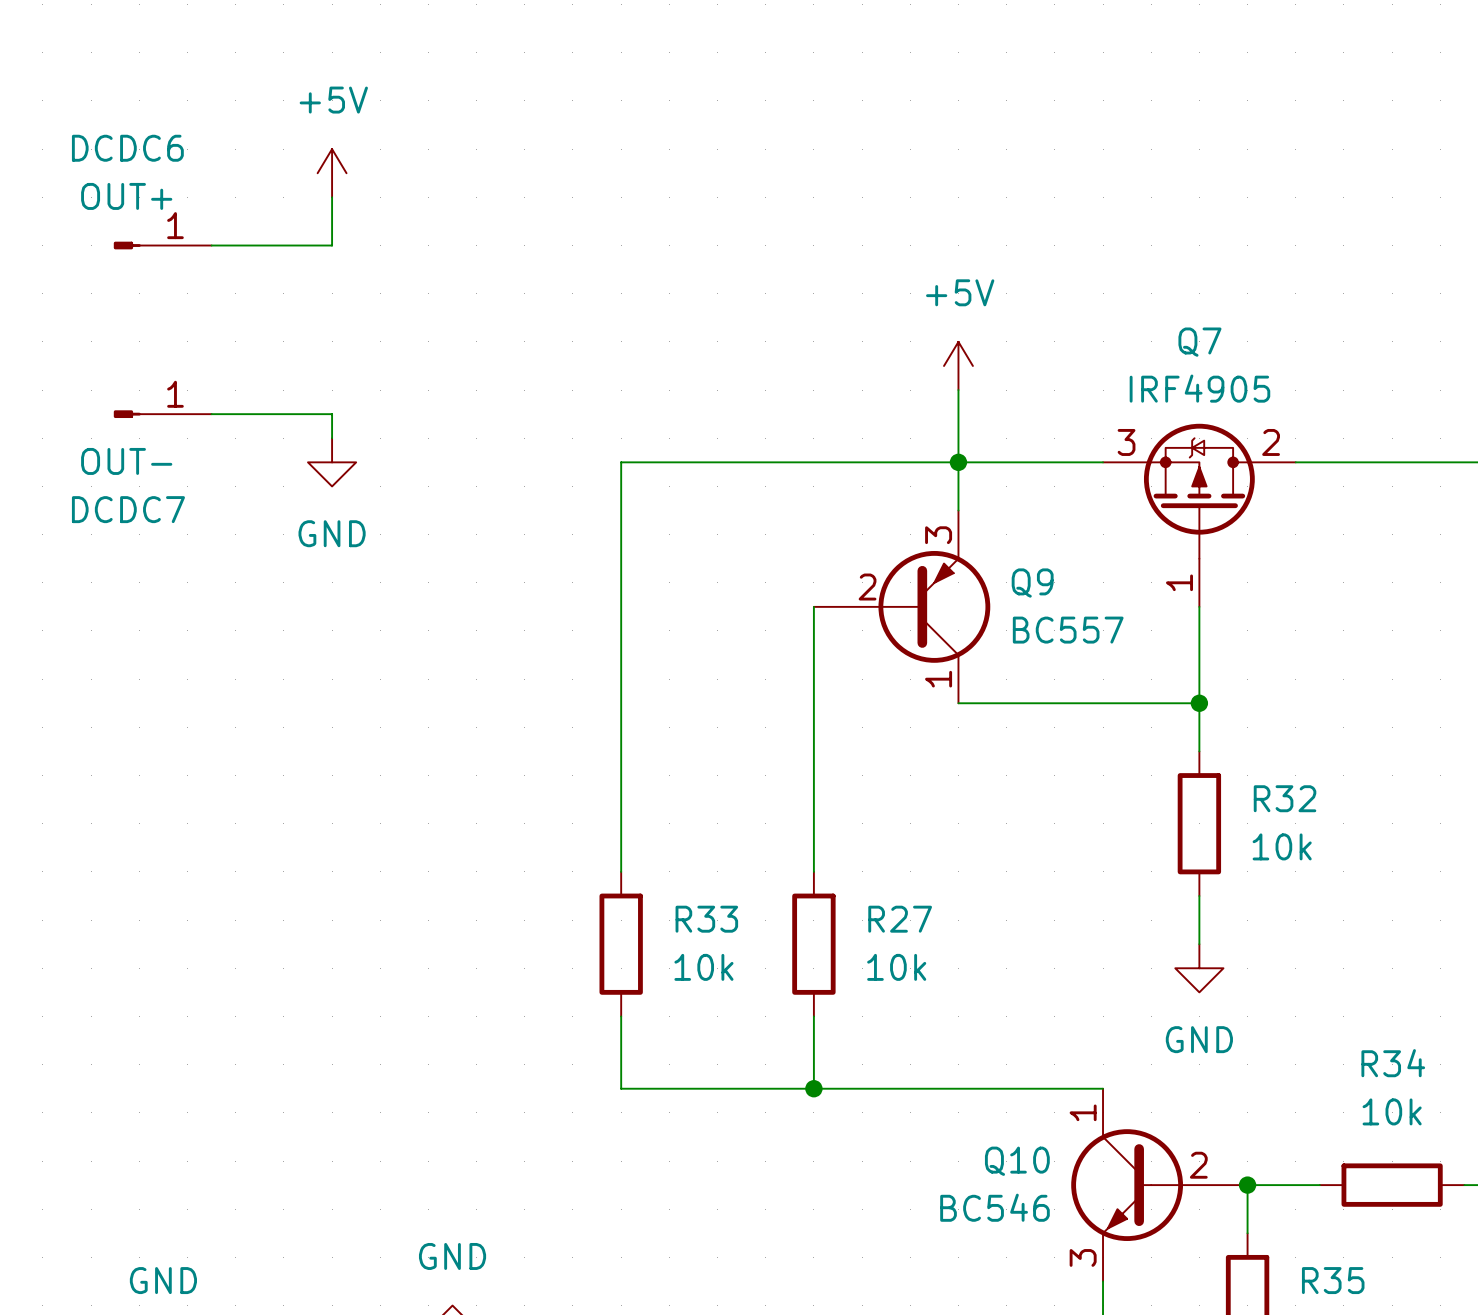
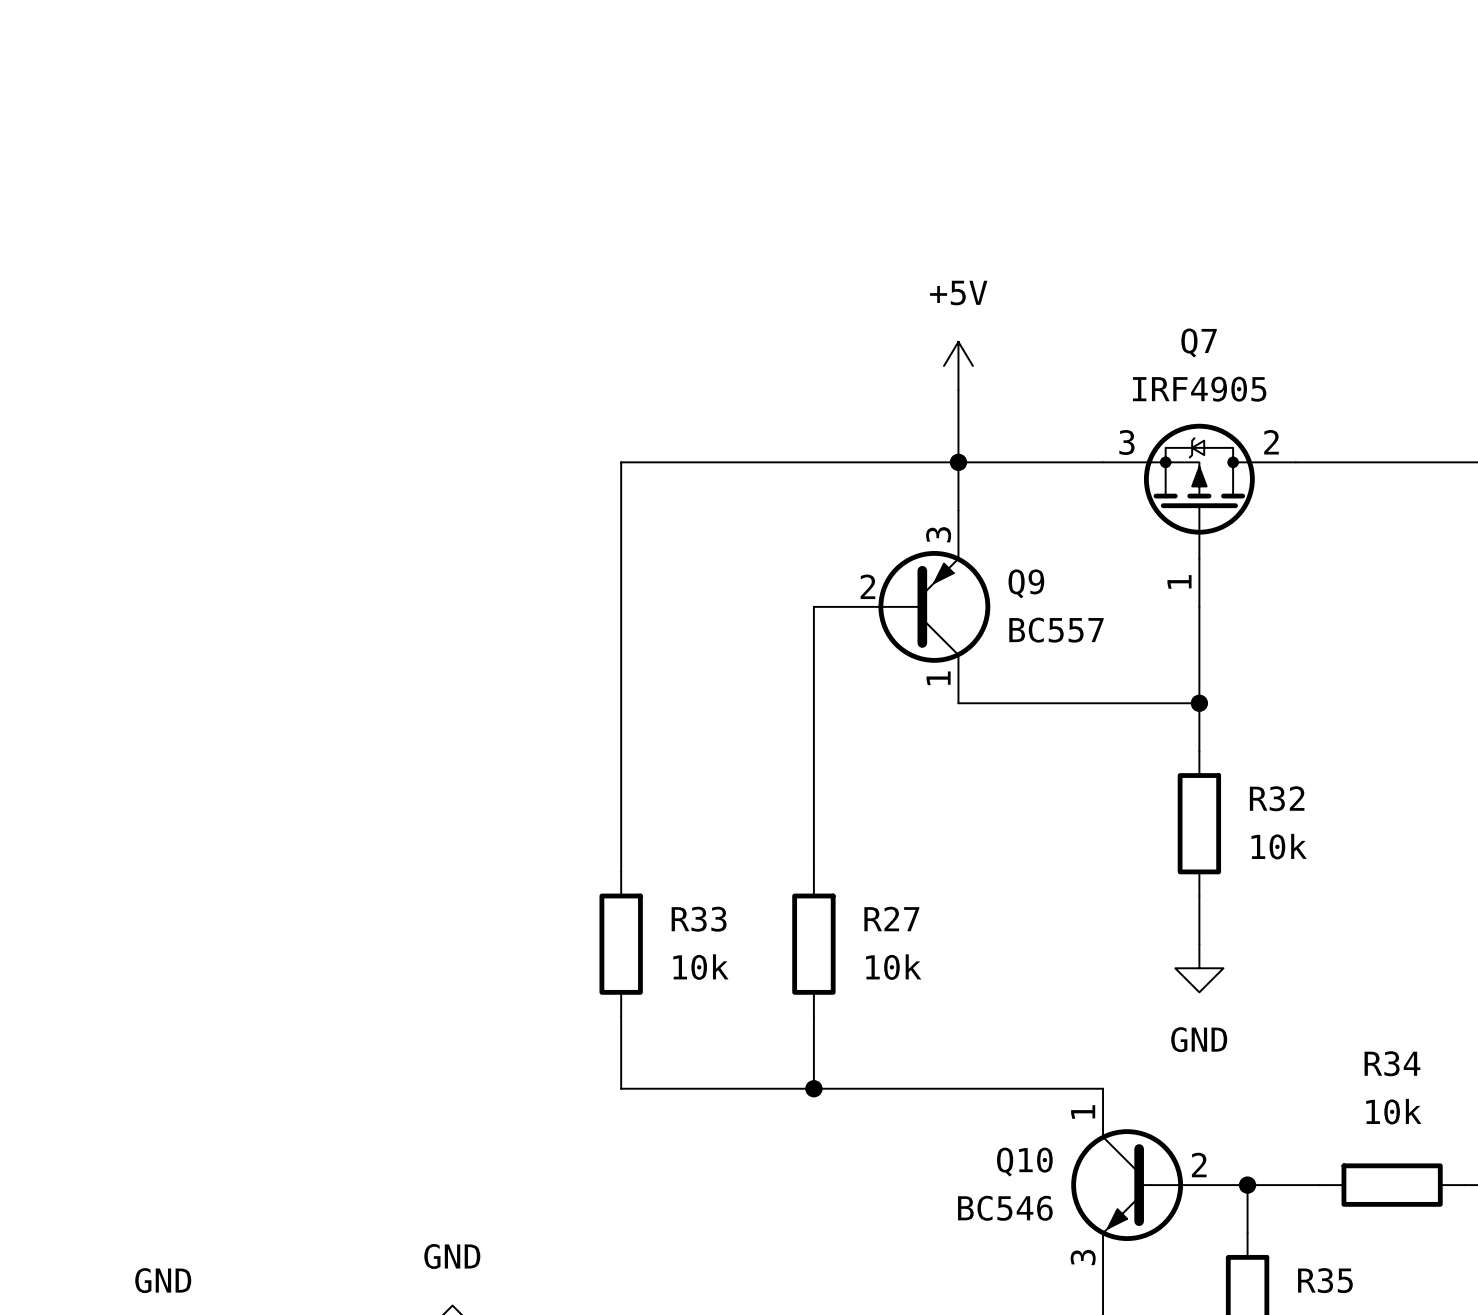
power symbol: +5V (332, 173) -> none
wire: (332, 197) (332, 245) (211, 245) -> none
DCDC6: OUT+ (162, 245) -> none
DCDC7: OUT- (162, 414) -> none
wire: (211, 414) (332, 414) (332, 438) -> none
power symbol: GND (332, 462) -> none

